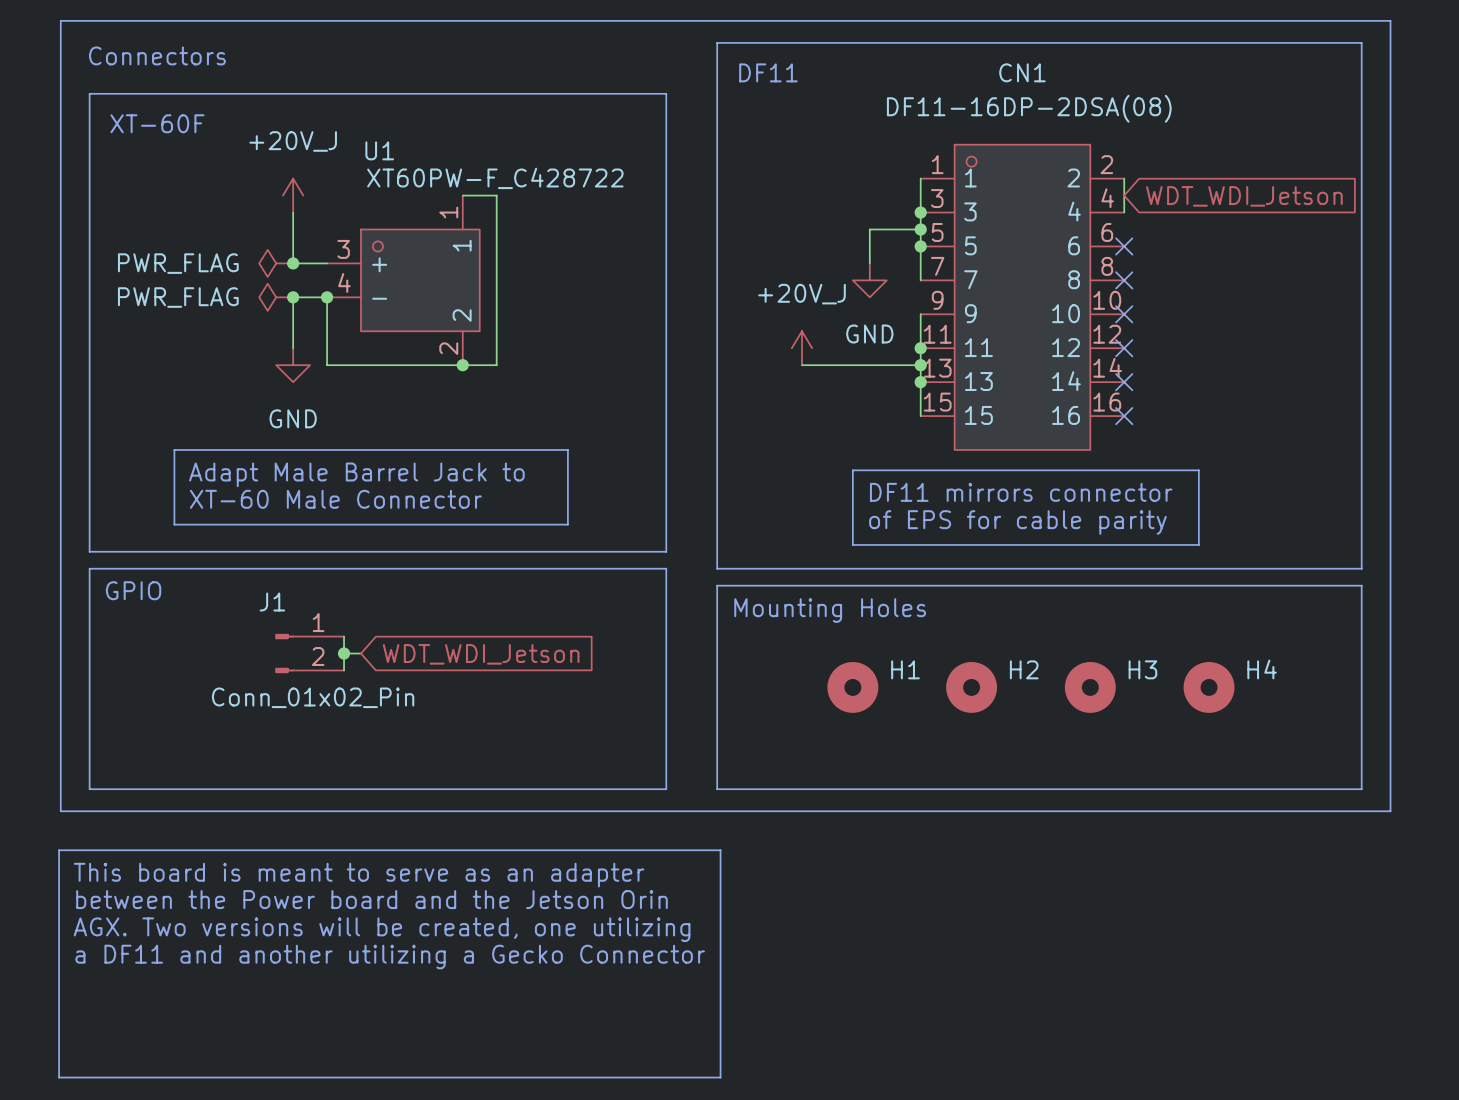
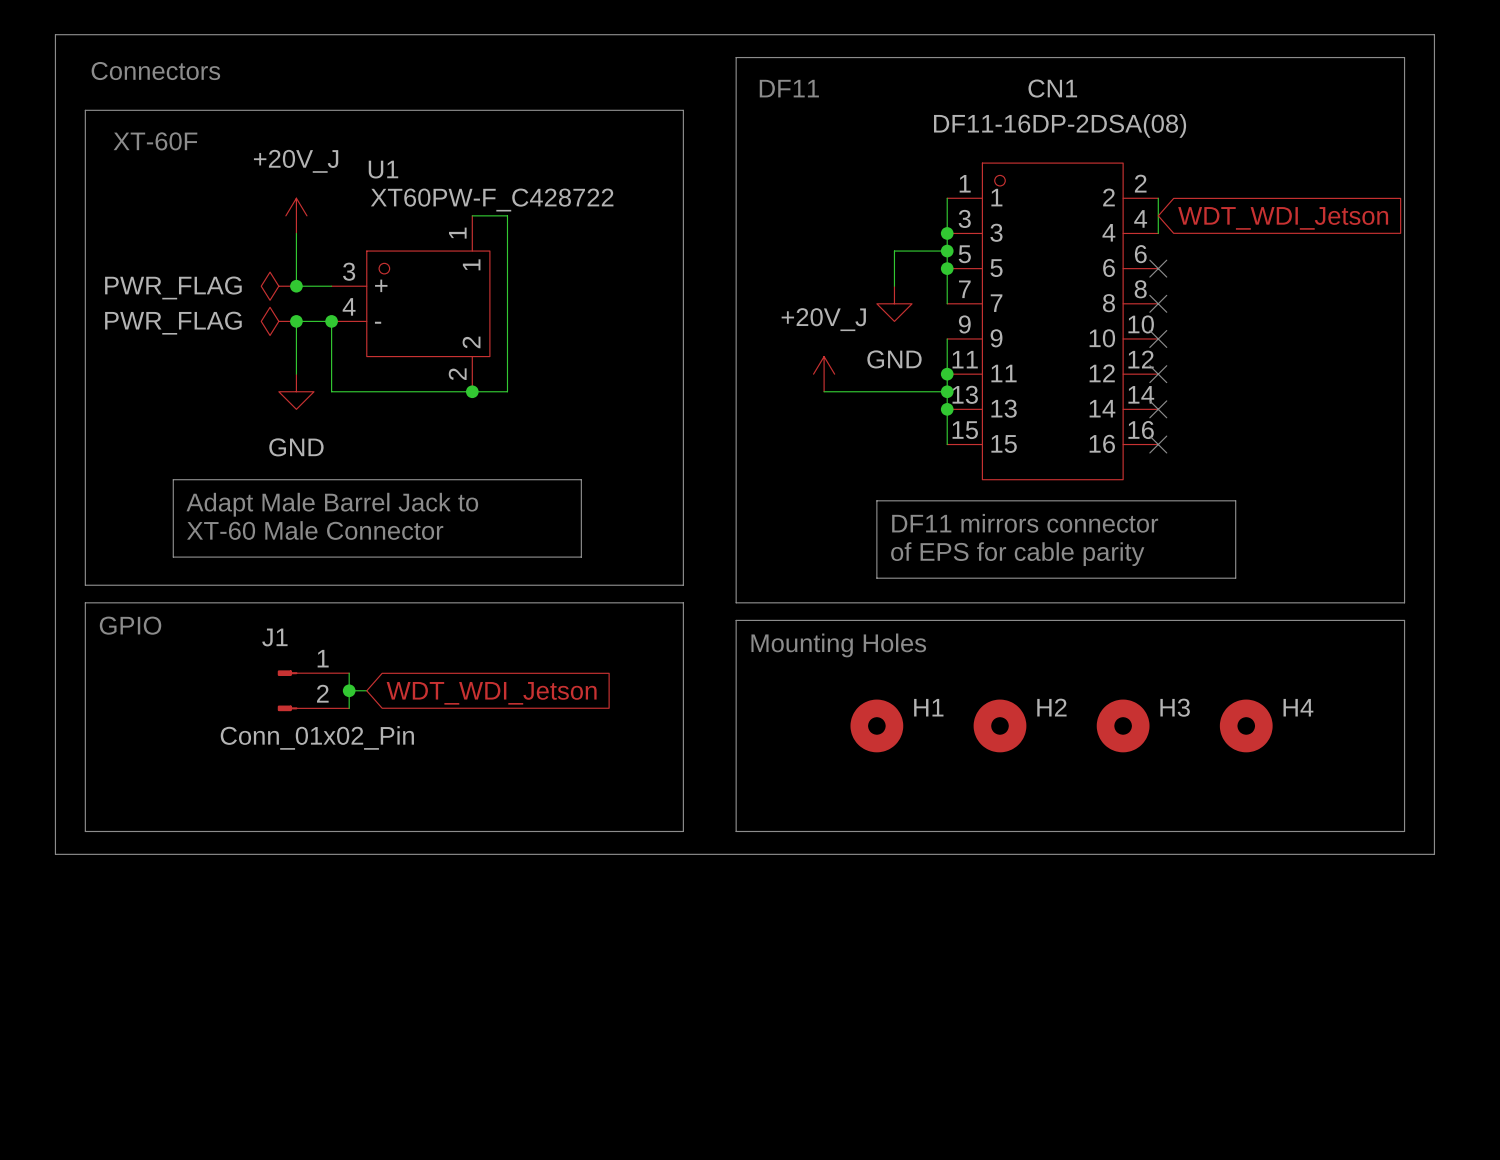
line: (59, 850) (720, 850) (720, 1077) (59, 1077) (59, 850) -> none
text: This board is meant to serve as an adapter (359, 875) -> none
text: between the Power board and the Jetson Orin (371, 899) -> none
text: AGX. Two versions will be created, one utilizing (382, 929) -> none
text: a DF11 and another utilizing a Gecko Connector (390, 957) -> none

